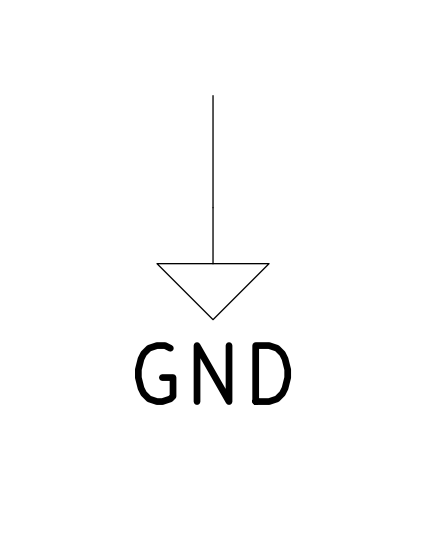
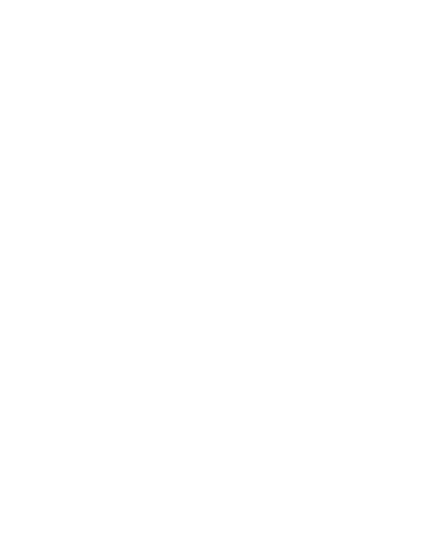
wire: (213, 95) (213, 207) -> none
power symbol: GND (213, 263) -> none

